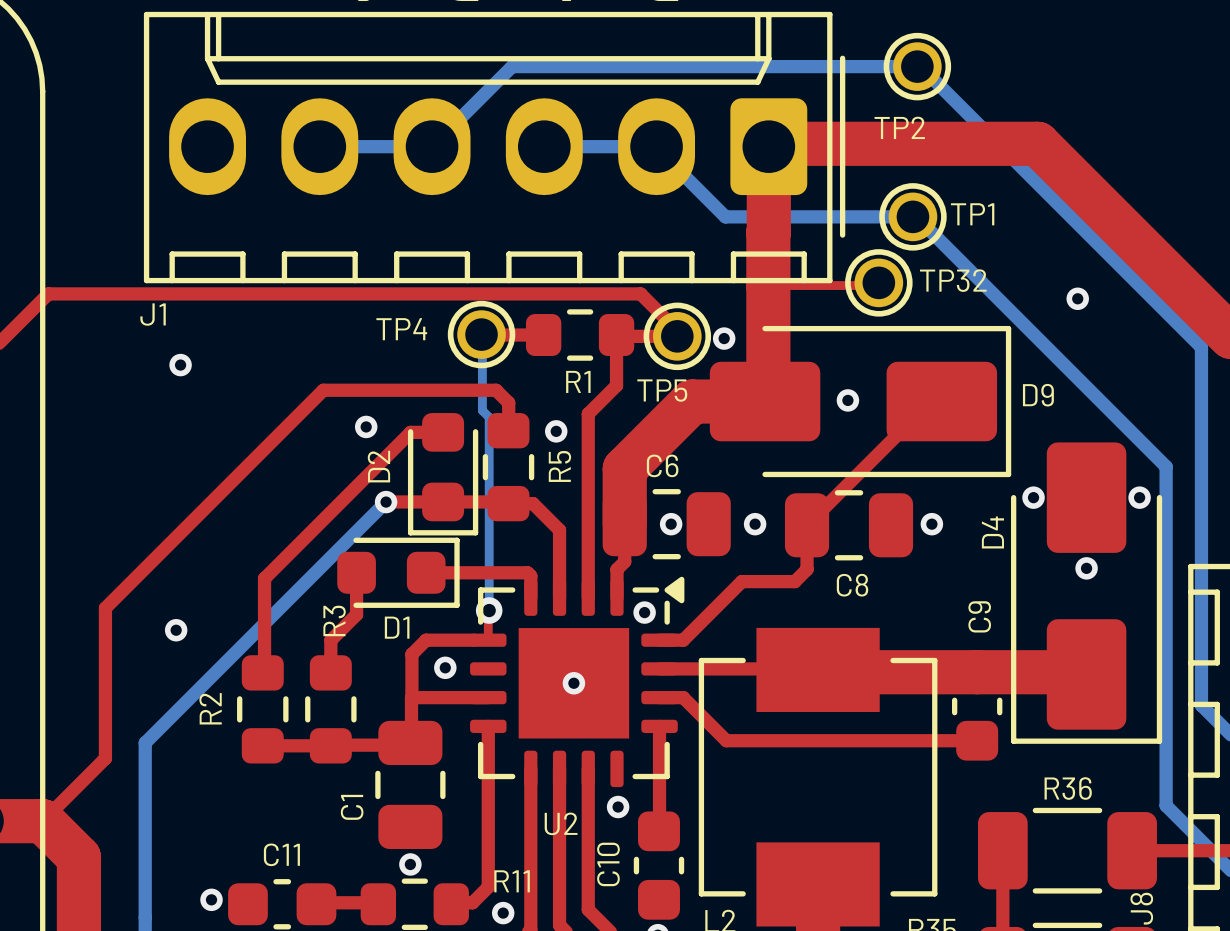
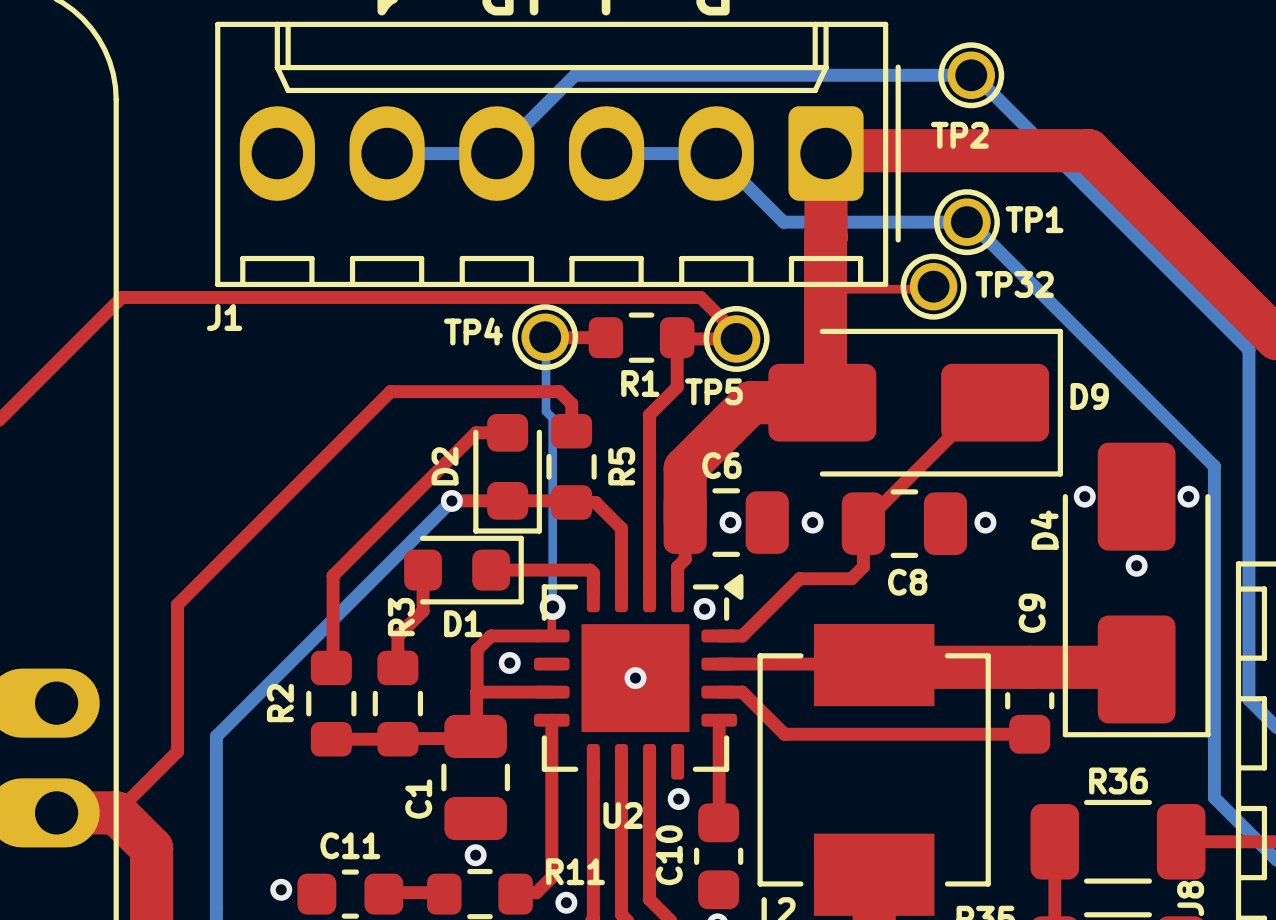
via: (1077, 298) -> none
via: (724, 338) -> none
via: (180, 365) -> none
via: (847, 400) -> none
via: (366, 426) -> none
via: (556, 431) -> none
via: (176, 630) -> none

